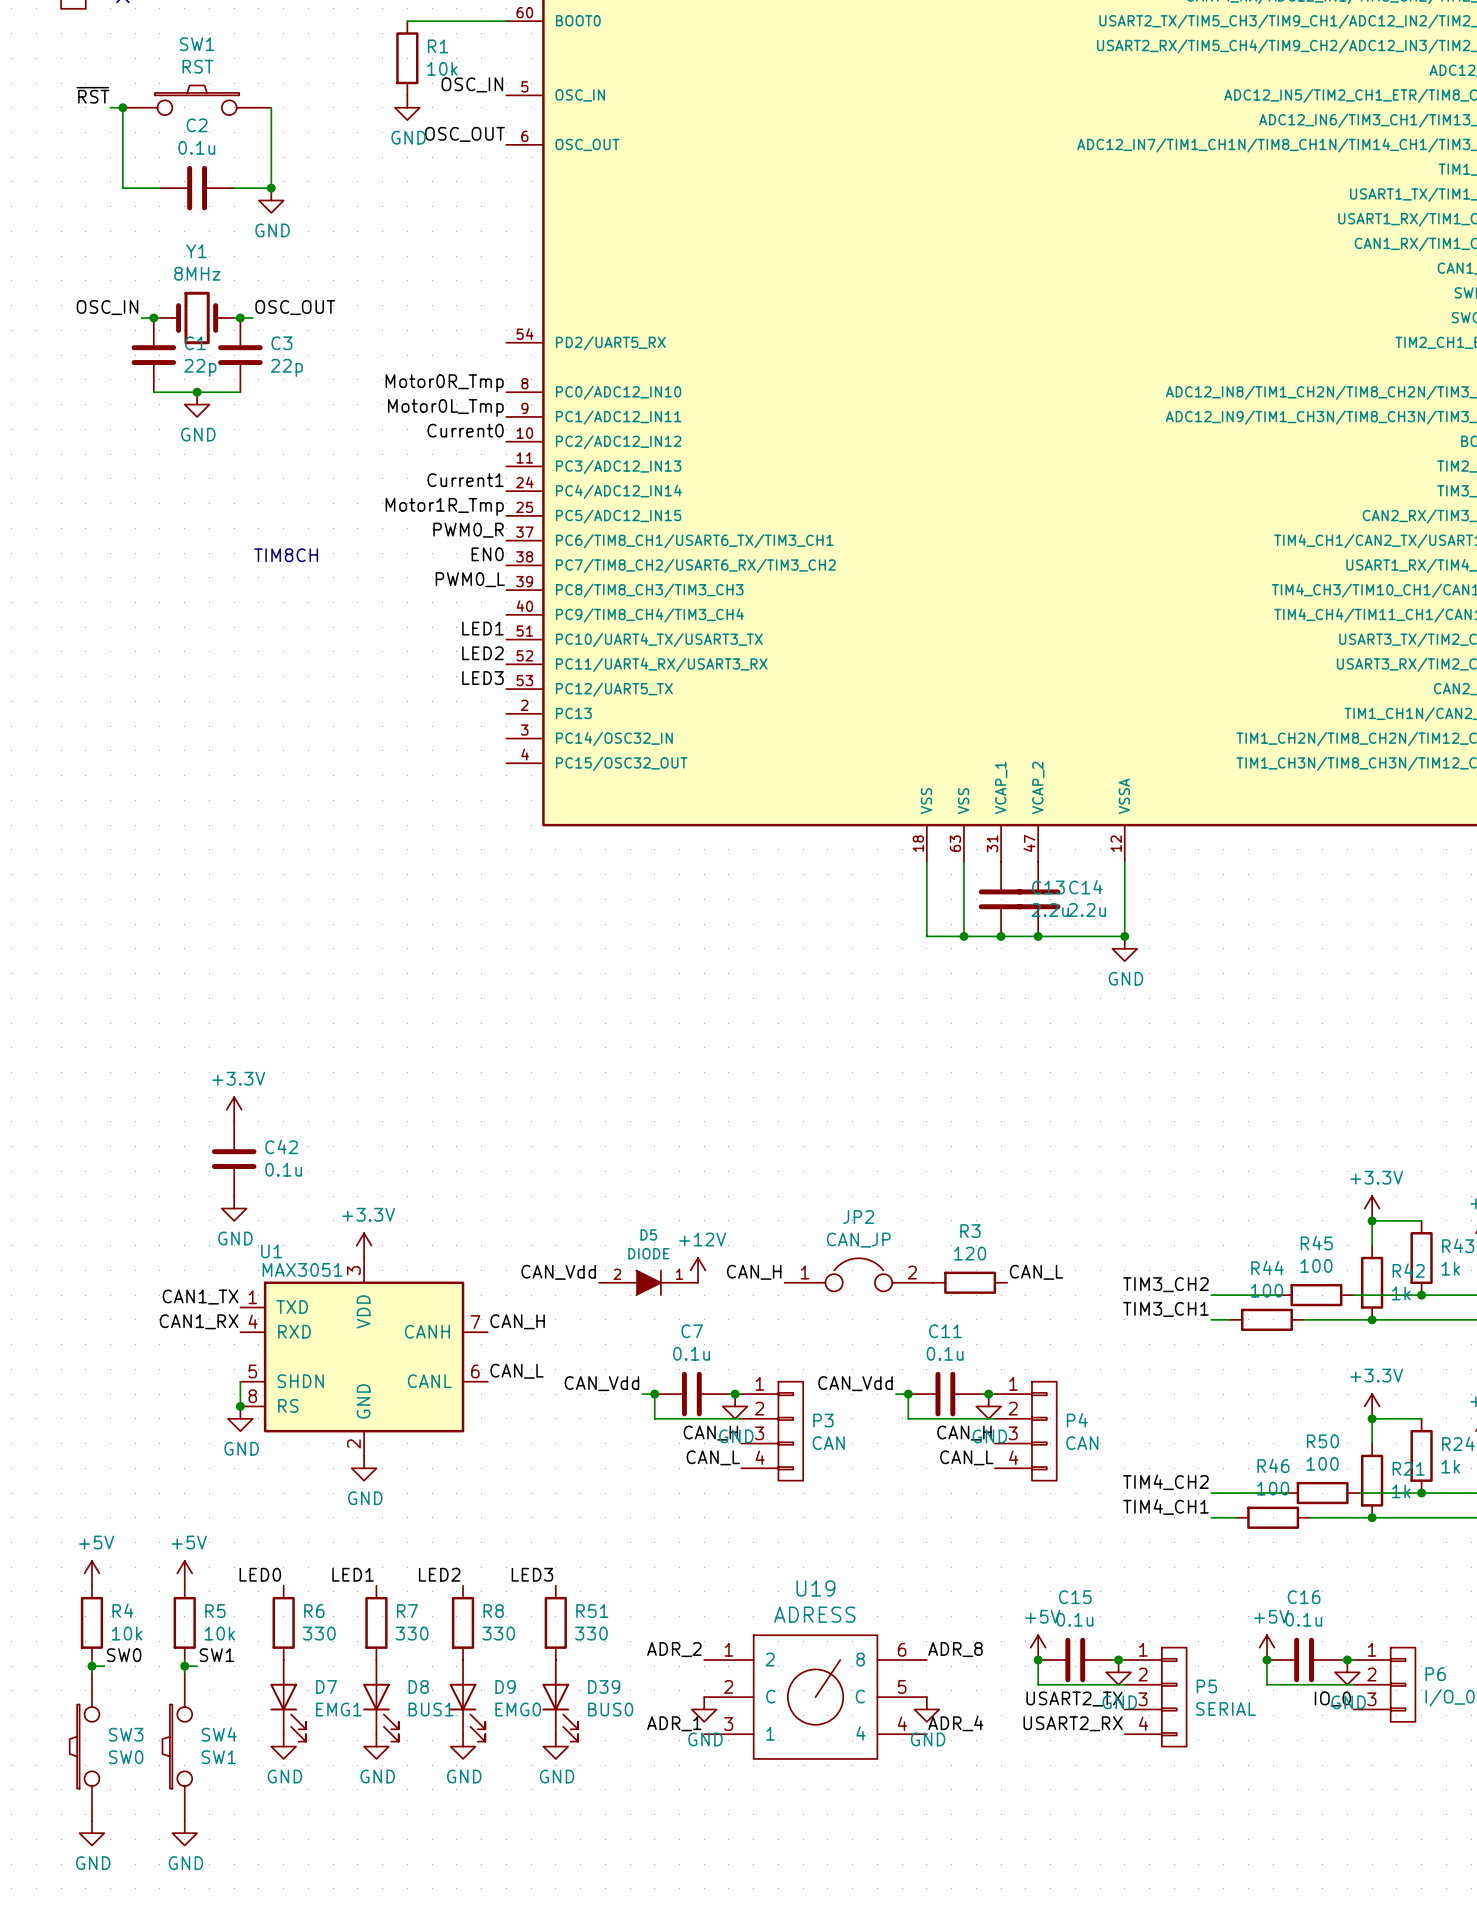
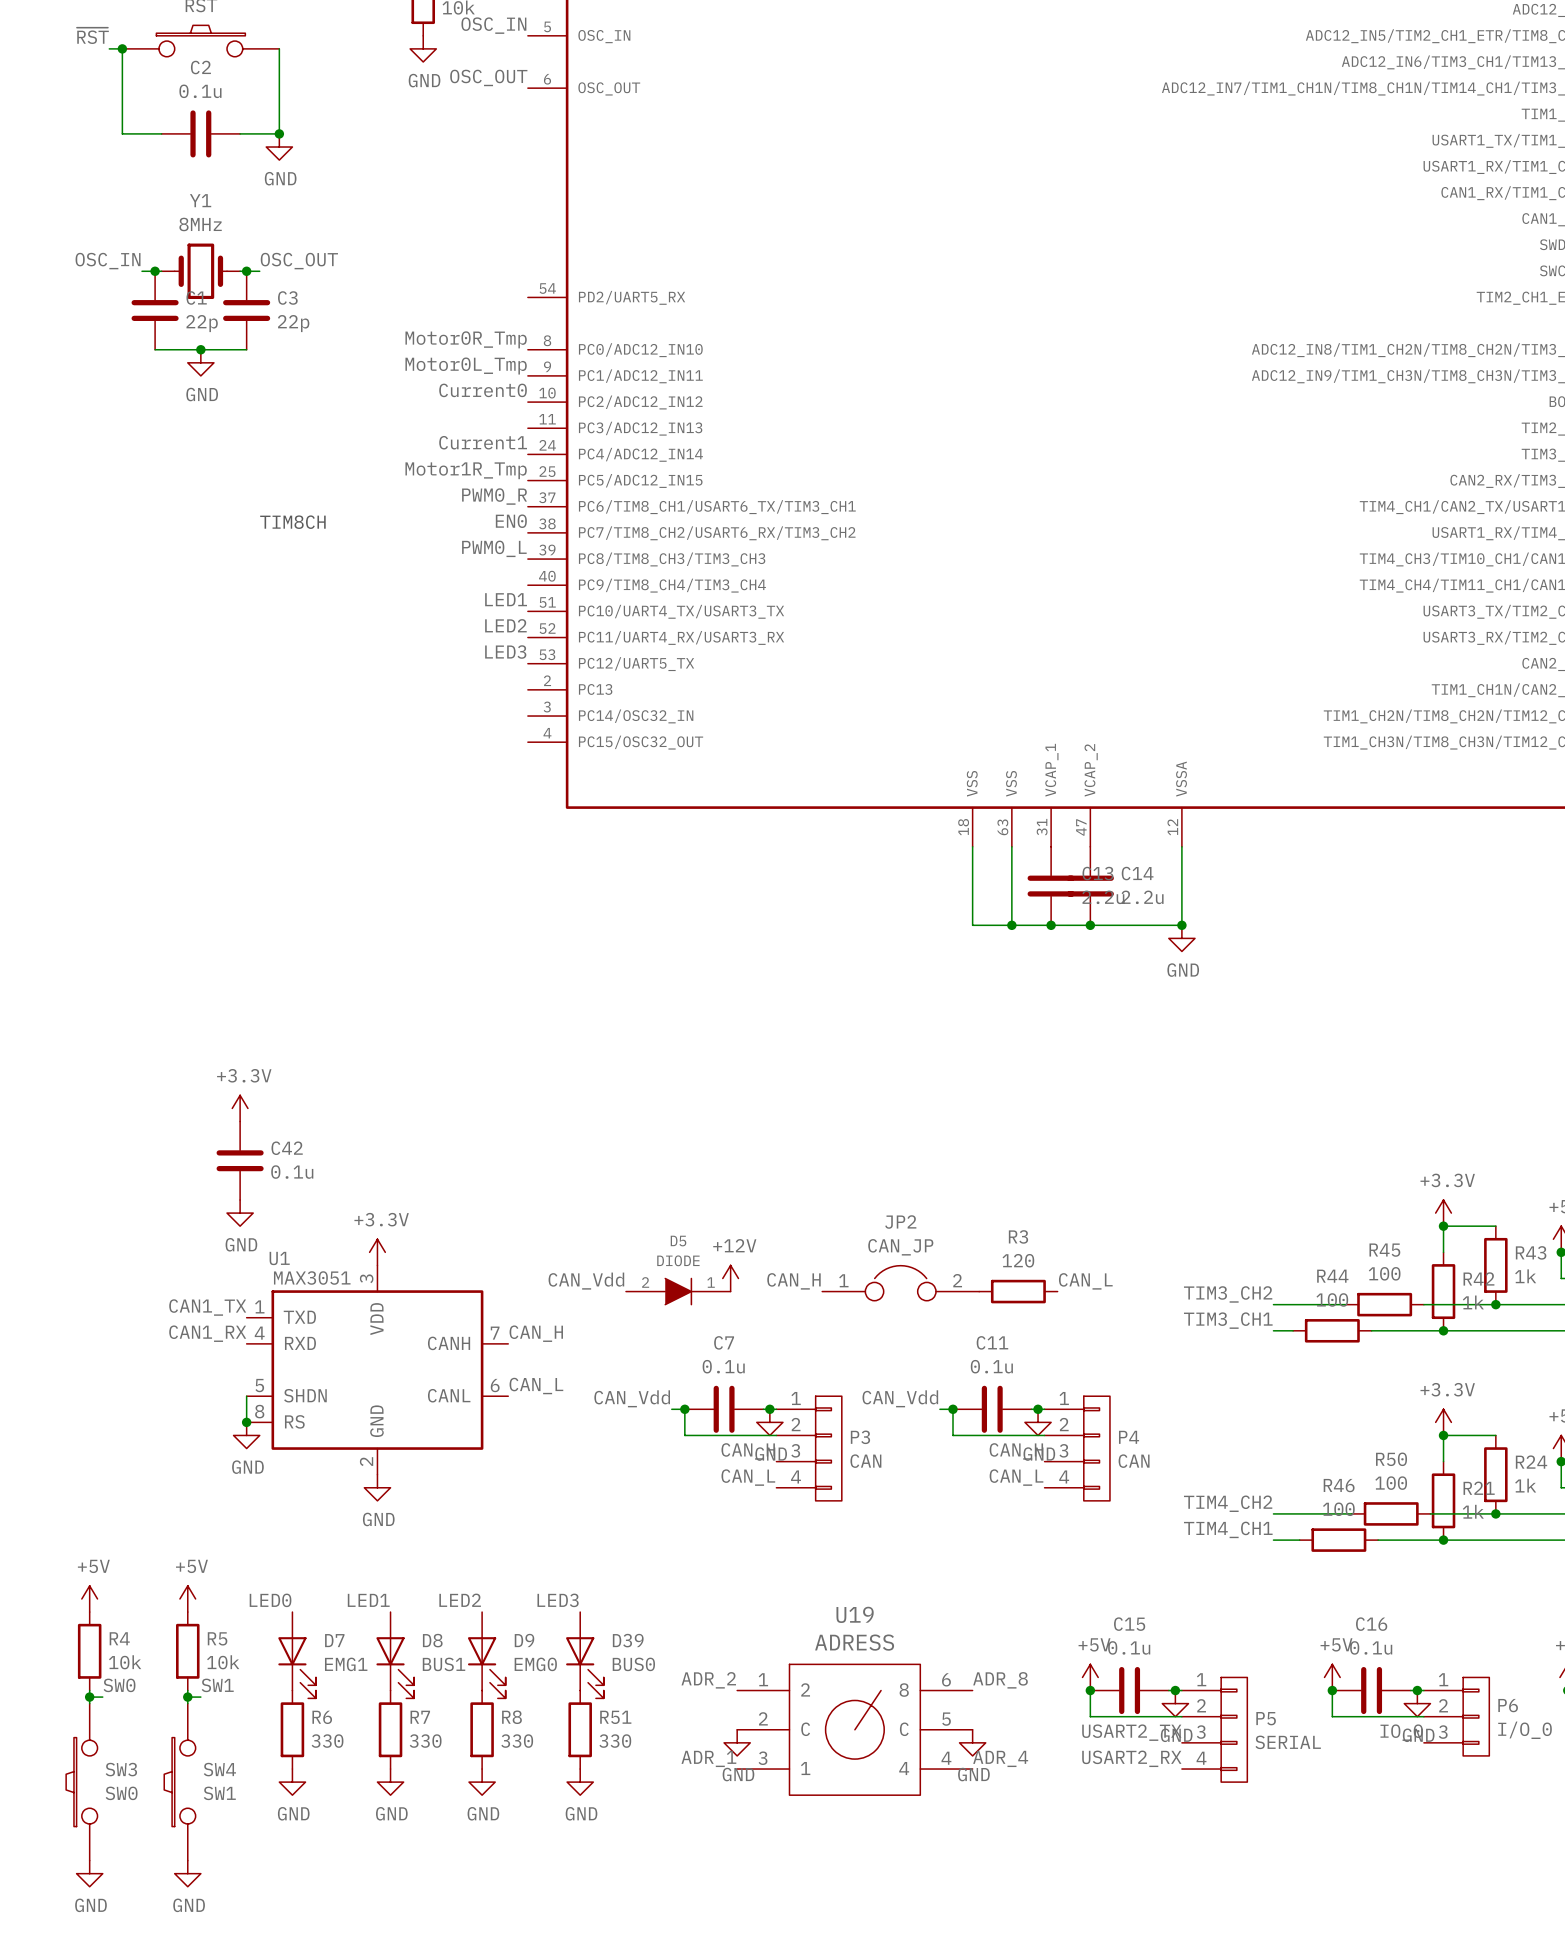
R6 position: (283, 1622) -> (292, 1729)
R7 position: (376, 1622) -> (390, 1729)
R8 position: (463, 1622) -> (482, 1729)
R51 position: (555, 1622) -> (580, 1729)
D7 position: (288, 1700) -> (297, 1655)
D8 position: (380, 1700) -> (395, 1655)
D9 position: (467, 1700) -> (486, 1655)
D39 position: (560, 1700) -> (584, 1655)

